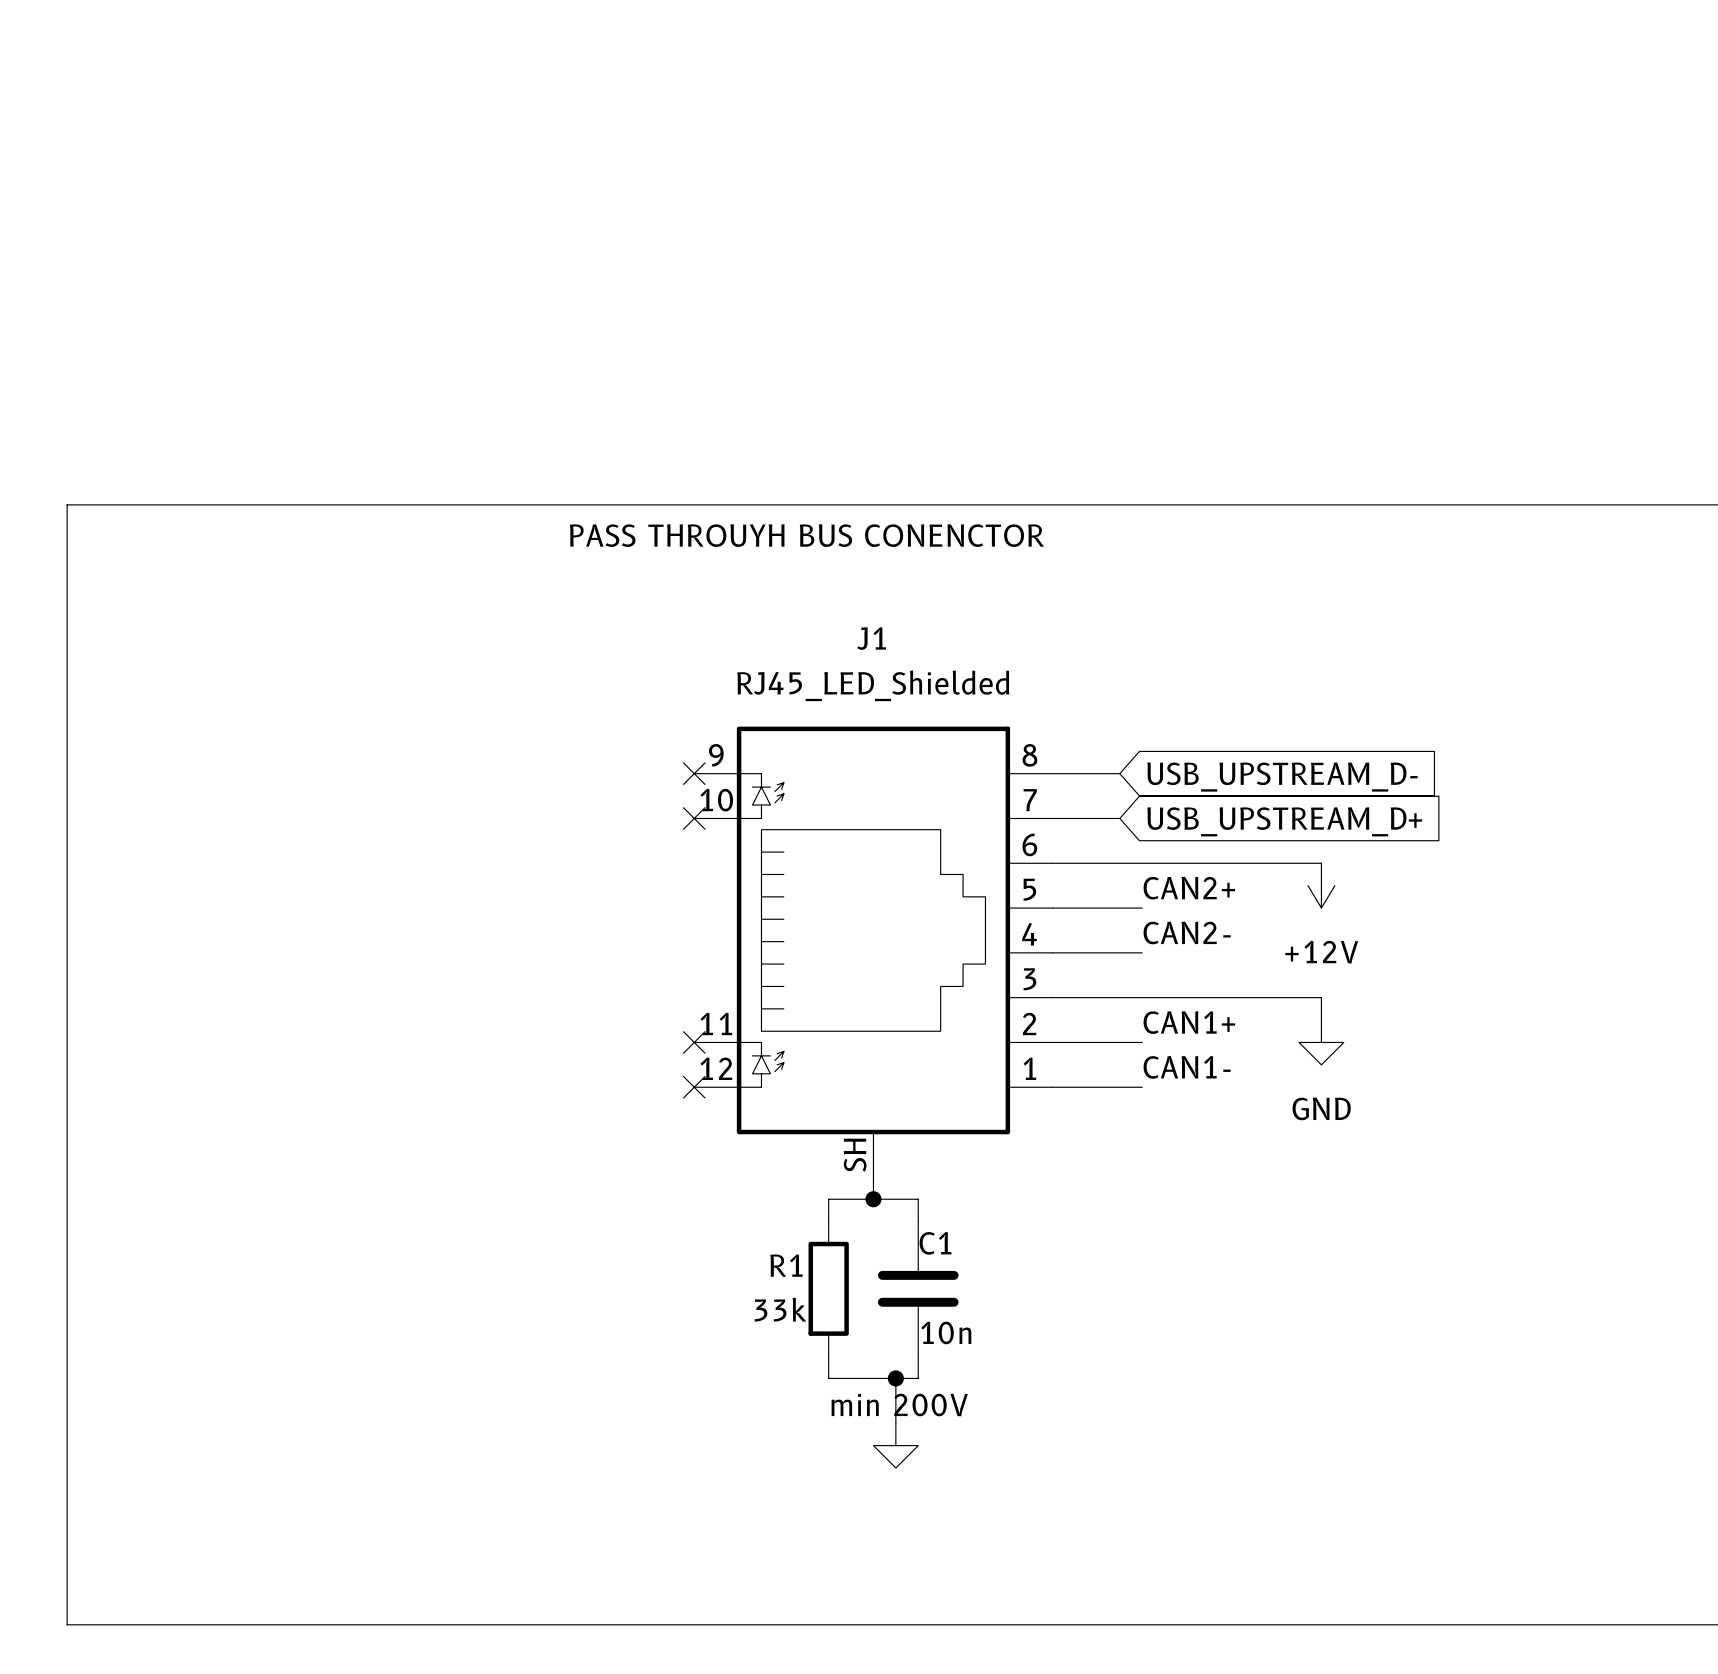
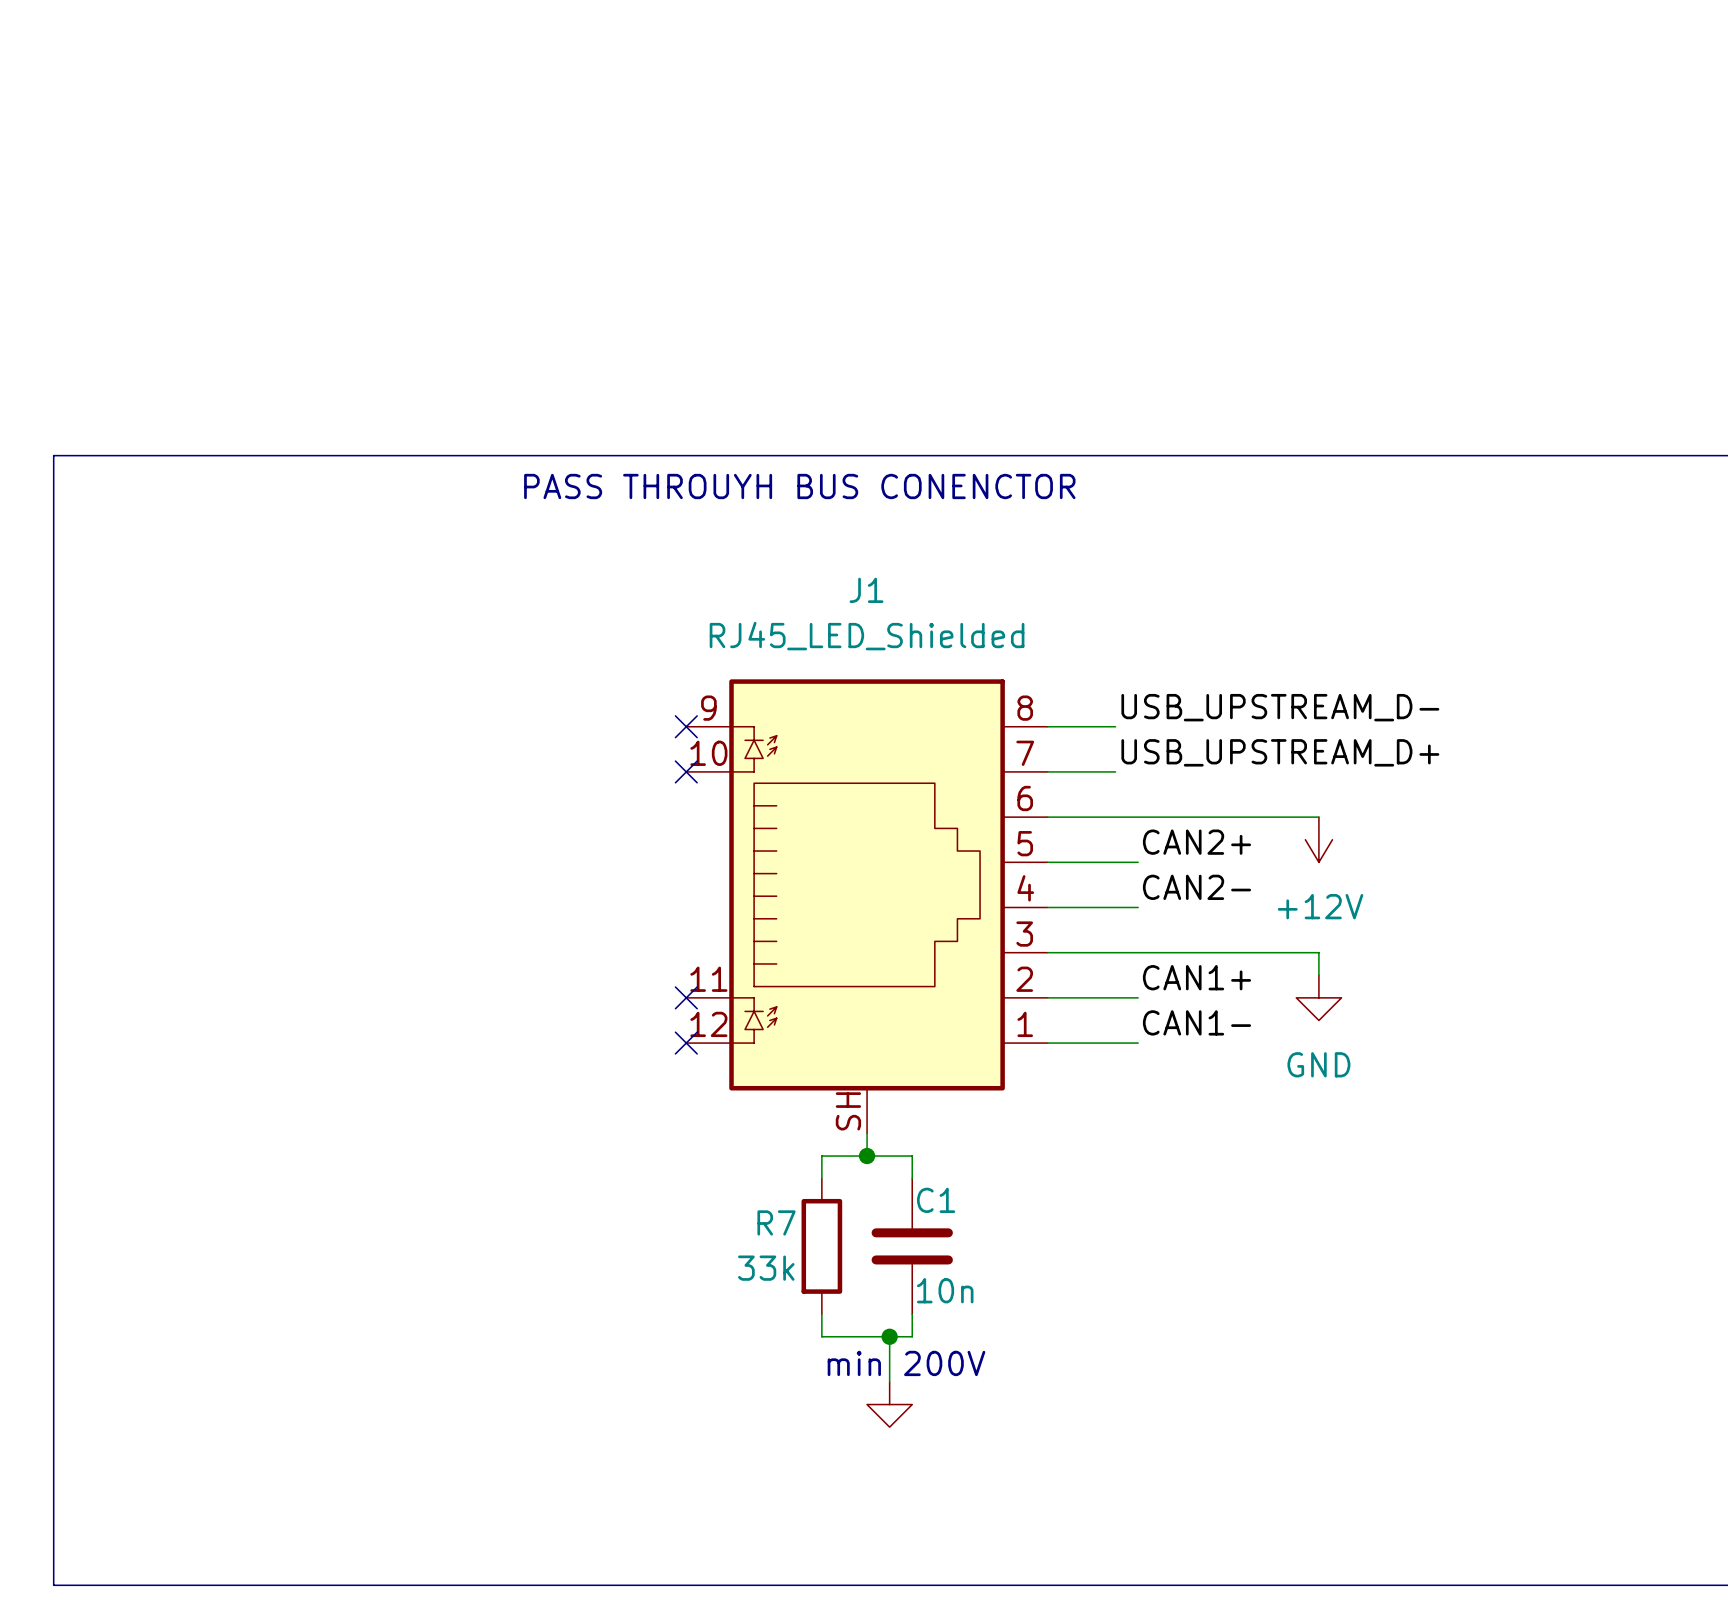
label: none -> USB_UPSTREAM_D- (1280, 707)
global label: USB_UPSTREAM_D- (1282, 777) -> none
label: none -> USB_UPSTREAM_D+ (1280, 752)
global label: USB_UPSTREAM_D+ (1284, 821) -> none
R1 name: R1 (786, 1265) -> R7 (776, 1222)

